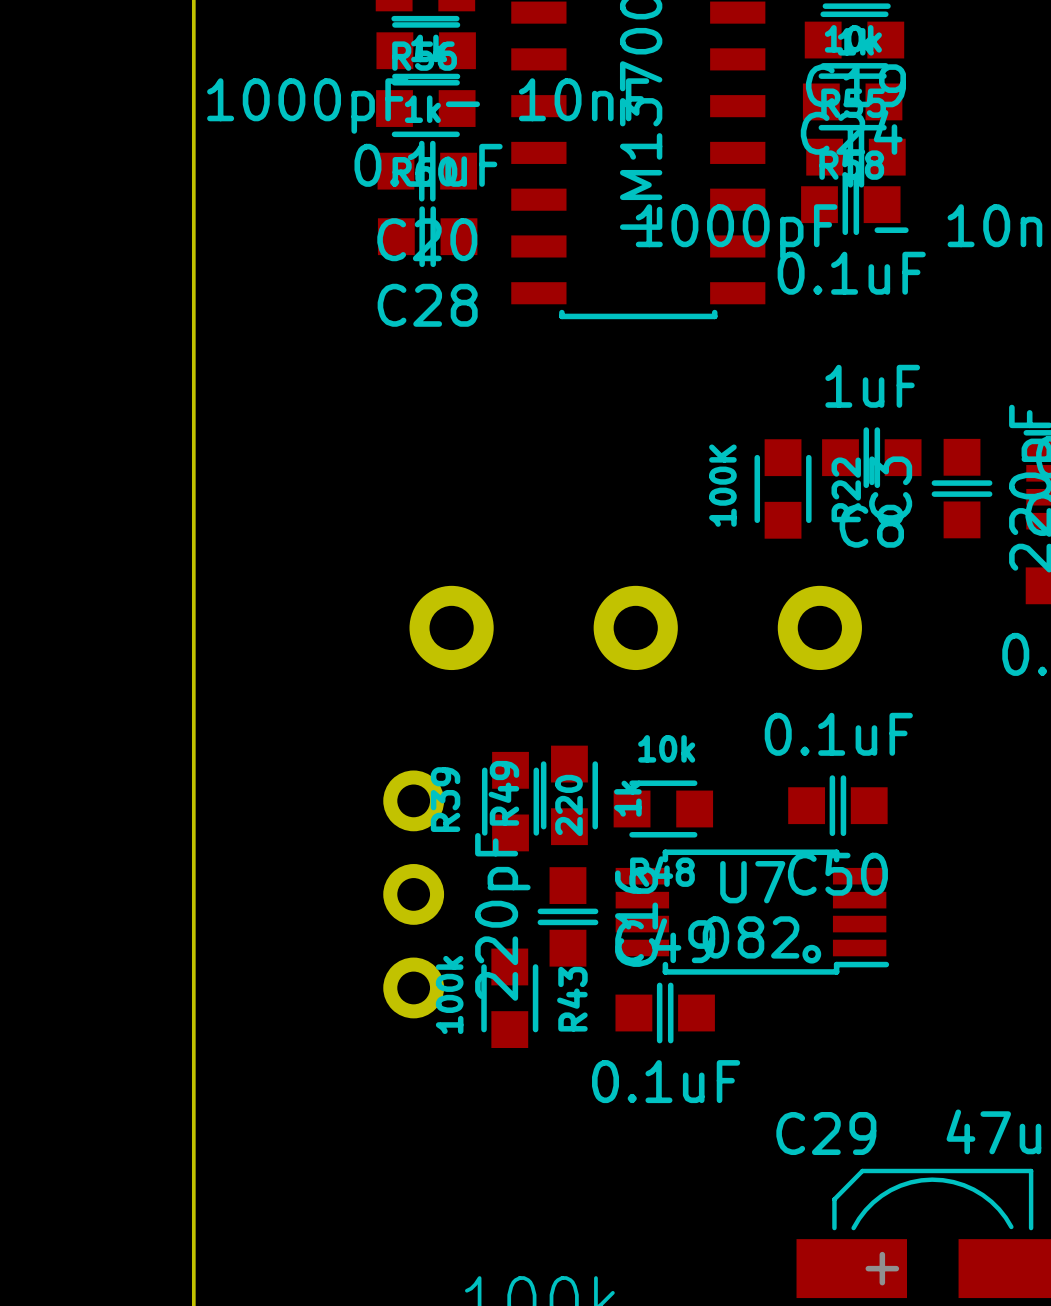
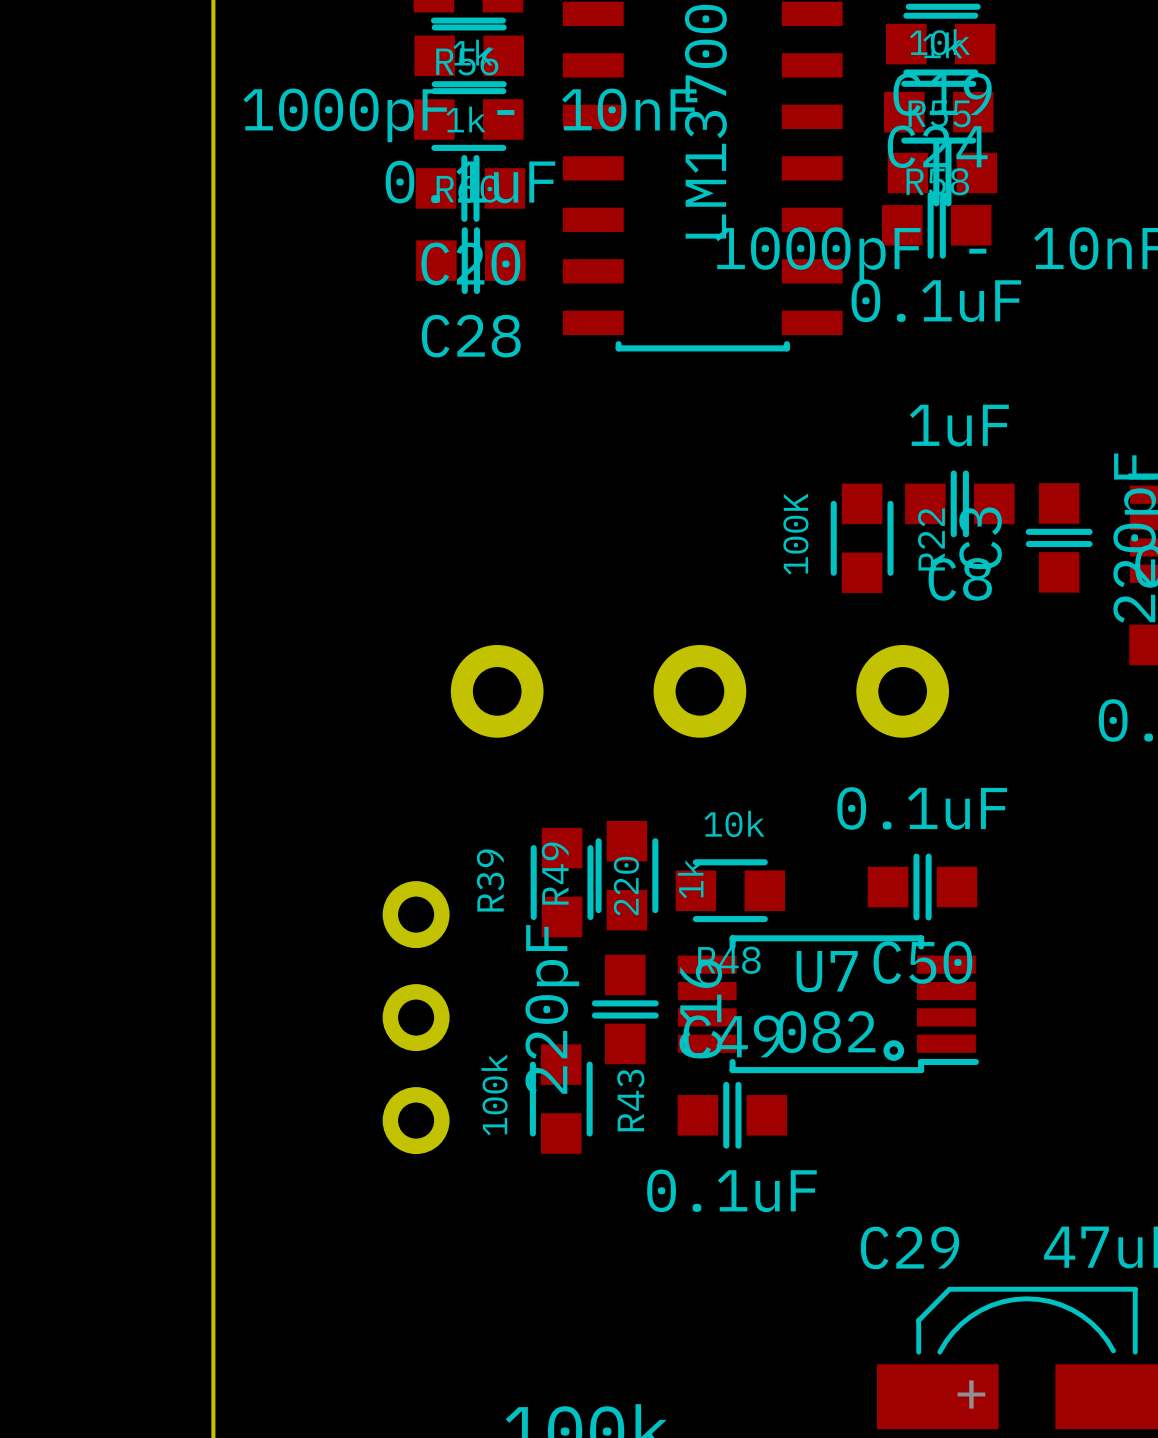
part position: (413, 894) -> (416, 1017)

